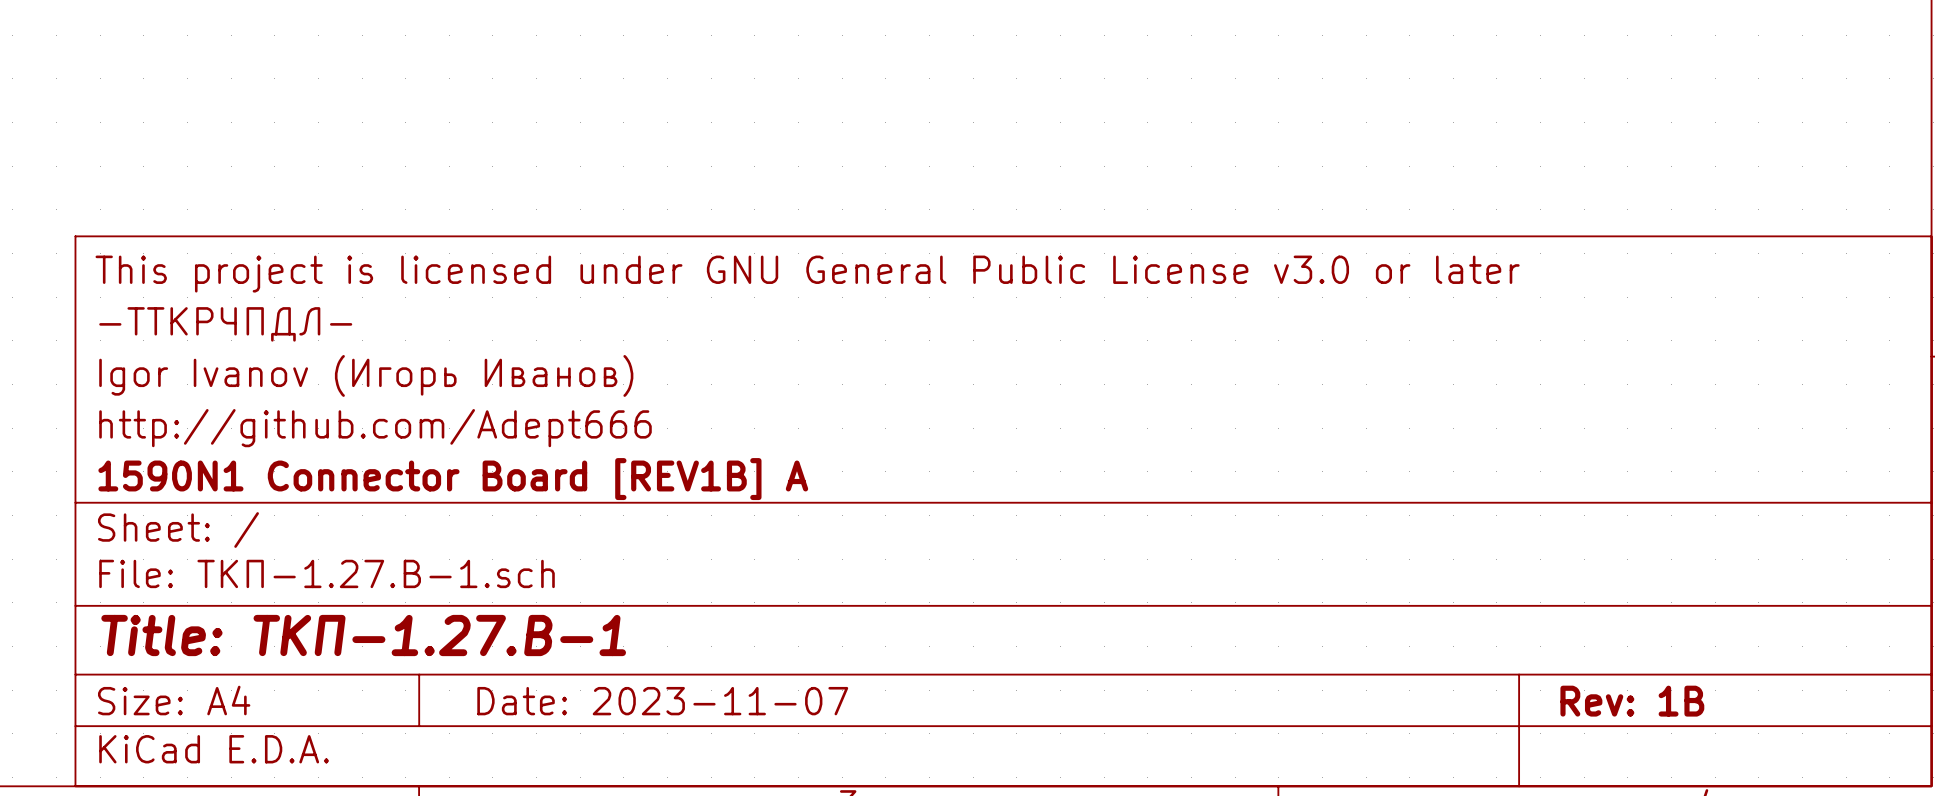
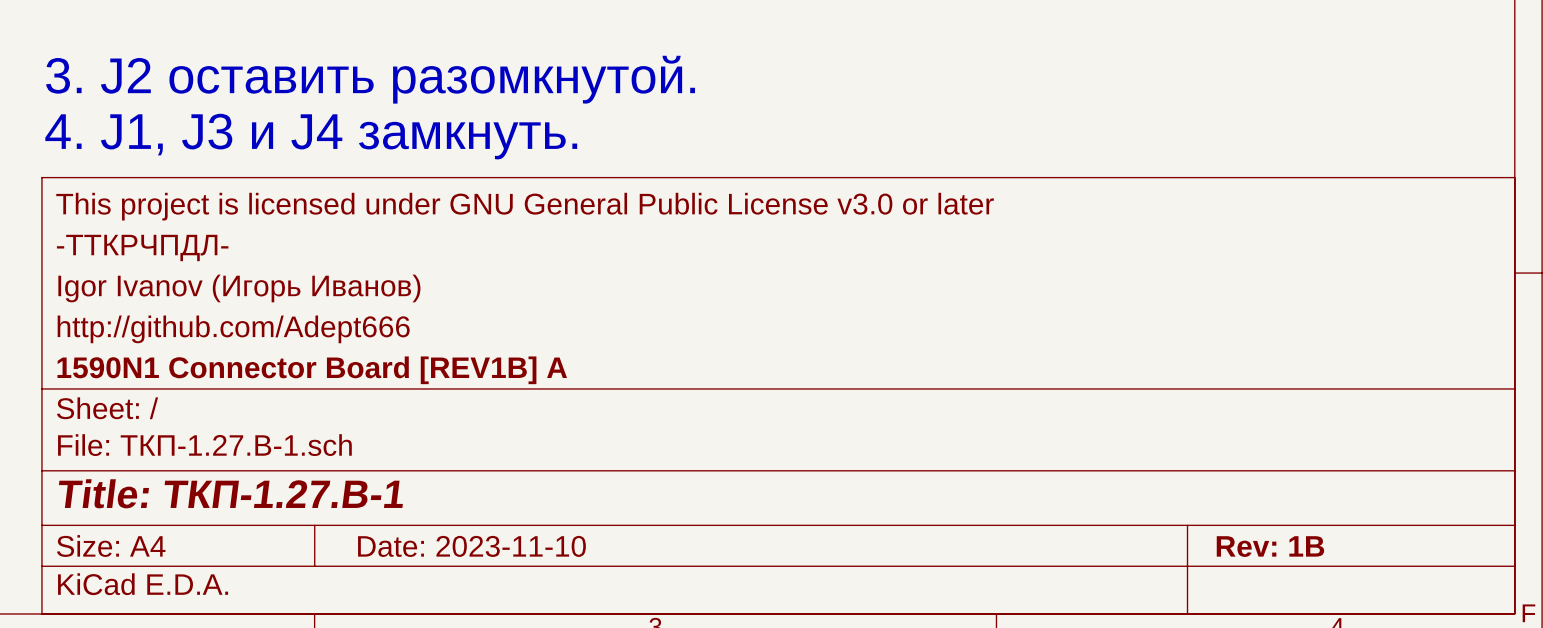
text: none -> 3. J2 оставить разомкнутой. (370, 79)
text: none -> 4. J1, J3 и J4 замкнуть. (311, 136)
title block: Date: 2023-11-07 (662, 701) -> Date: 2023-11-10 (471, 546)

